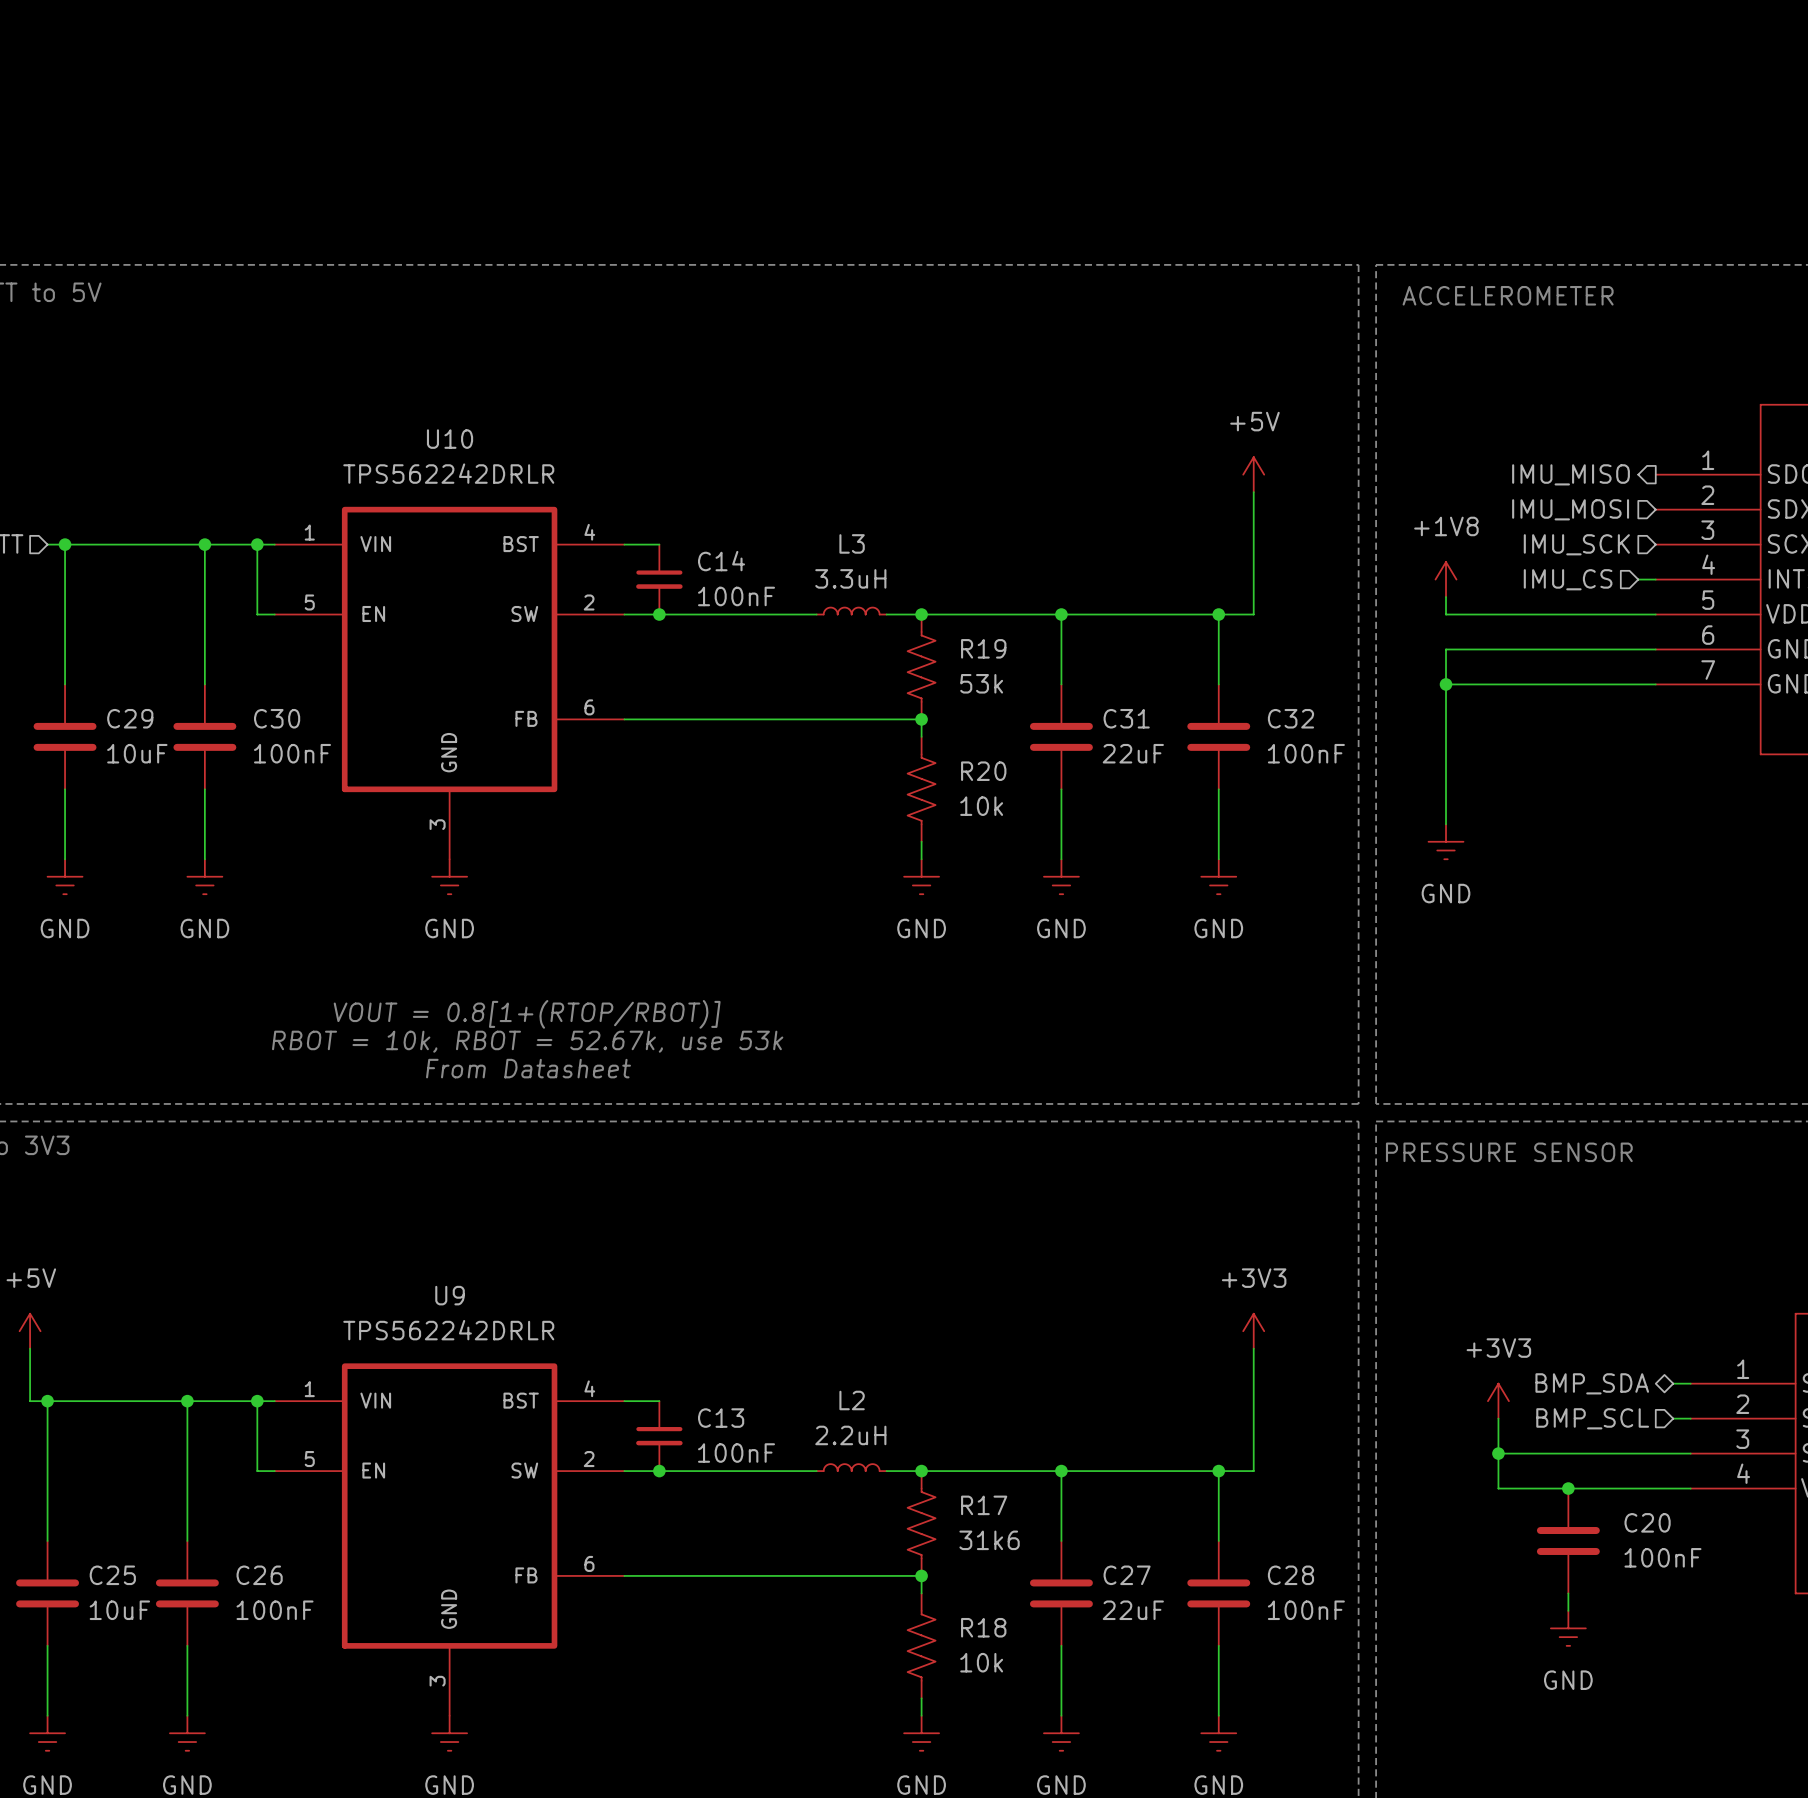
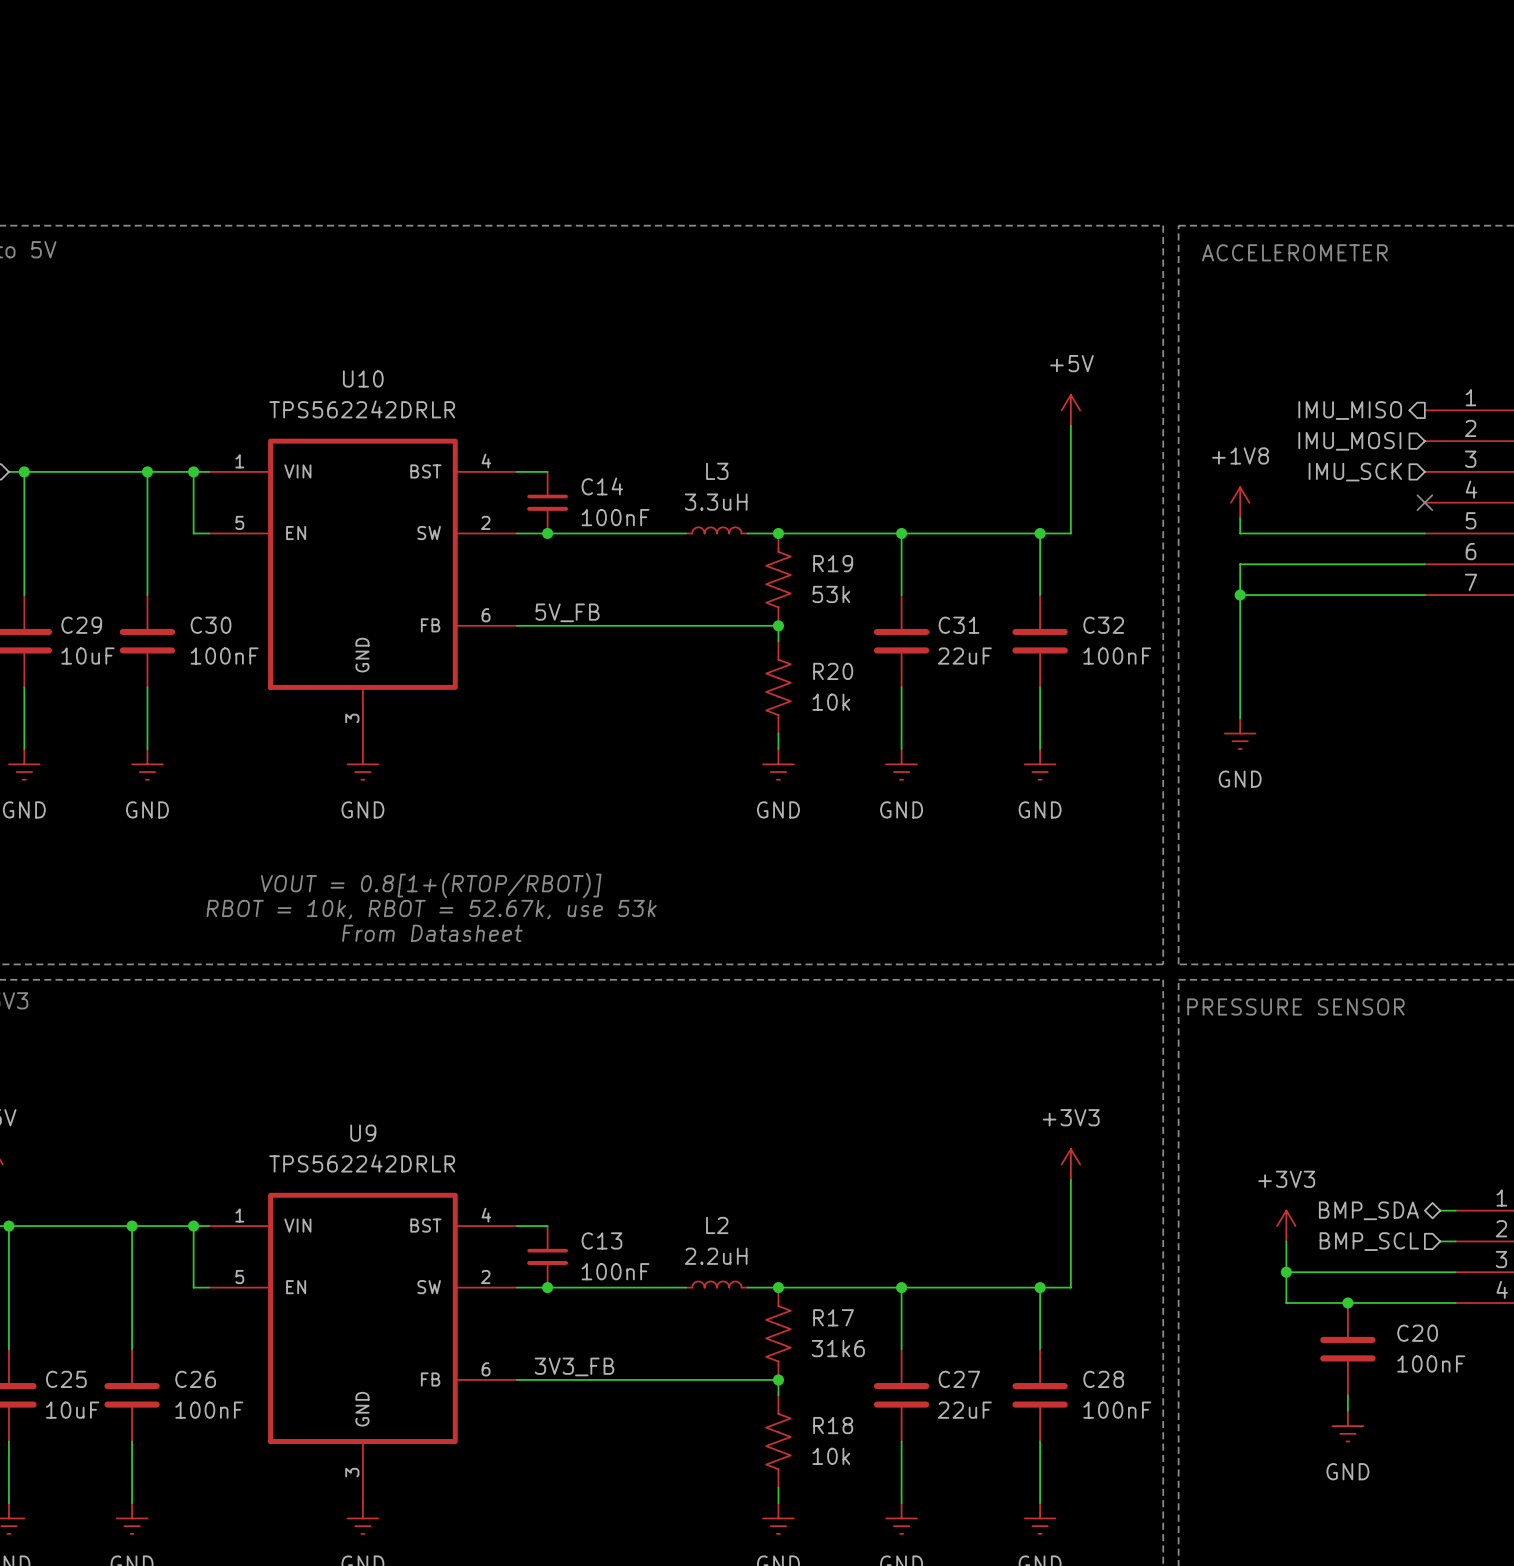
hierarchical label: IMU_CS (1568, 579) -> none
wire: (1638, 579) (1655, 579) -> none
no-connect mark: none -> (1424, 502)
label: none -> 5V_FB (567, 612)
label: none -> 3V3_FB (574, 1366)

